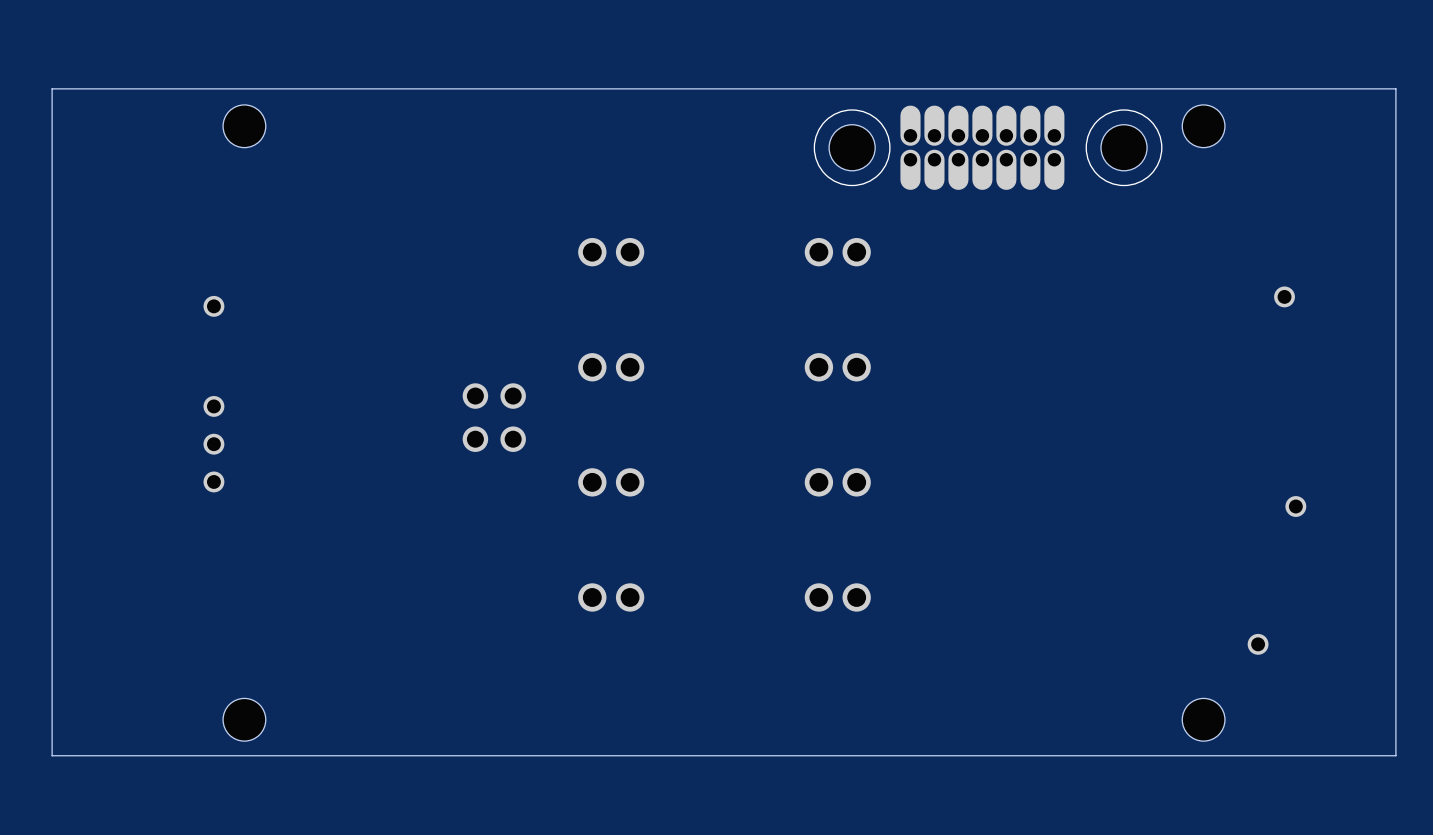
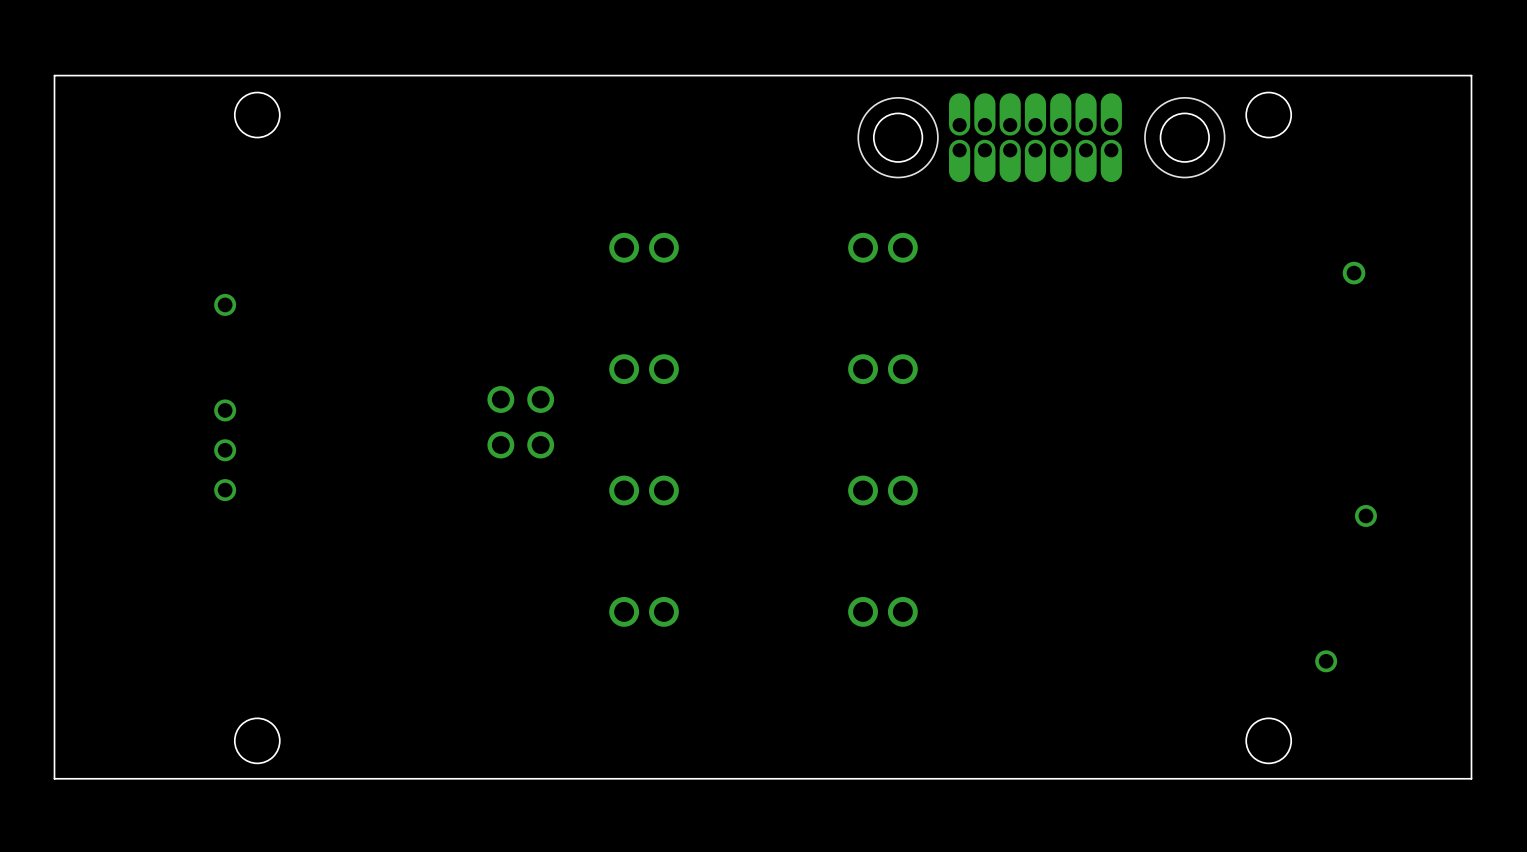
part: none -> (1354, 273)
part: (1284, 296) -> none

